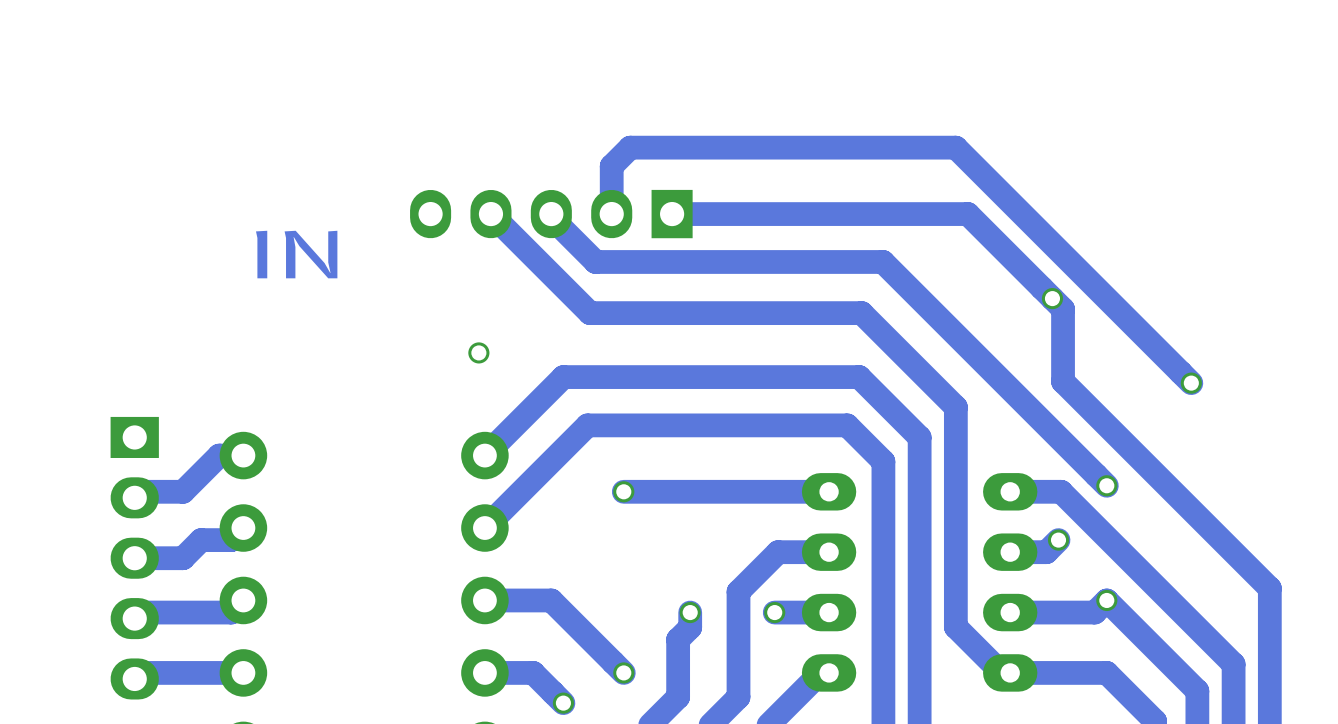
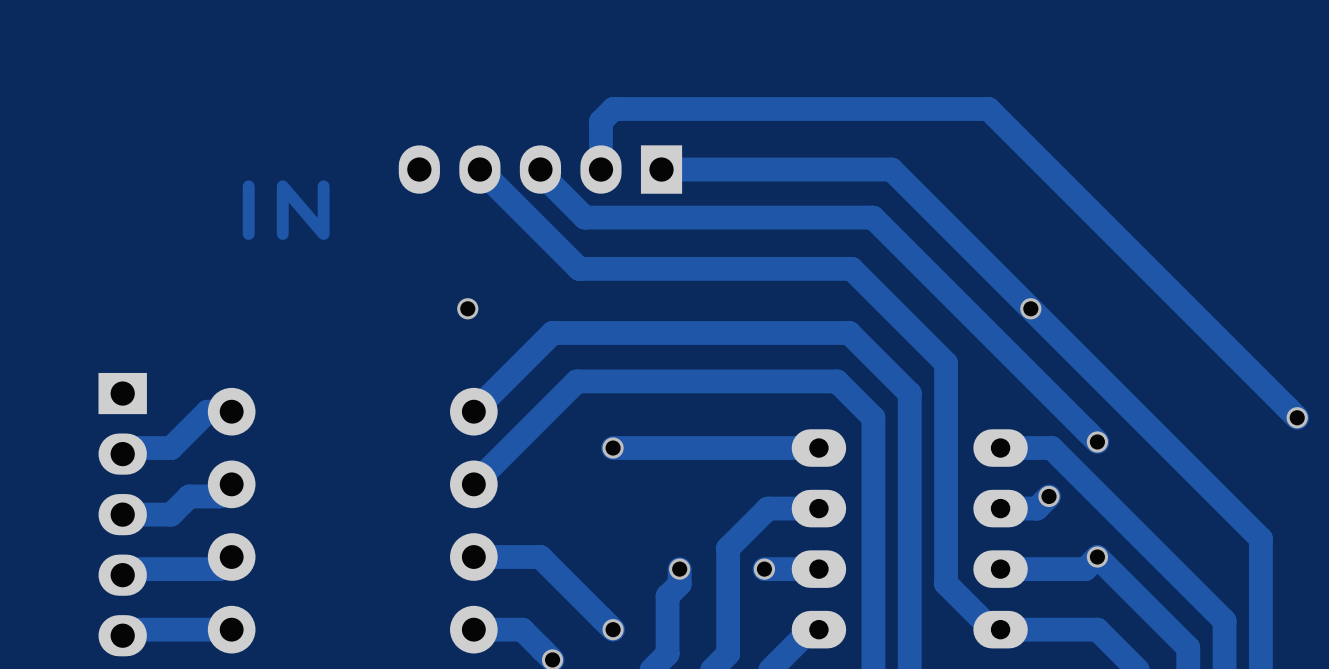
track: (624, 153) (630, 147) (955, 147) (1191, 383) -> (613, 109) (988, 109) (1297, 417)
track: (901, 214) (967, 214) (1063, 309) (1063, 381) (1269, 588) -> (891, 169) (1260, 538) (1260, 544)
via position: (1052, 298) -> (1030, 308)
via: (1191, 383) -> none
via: none -> (1297, 417)

